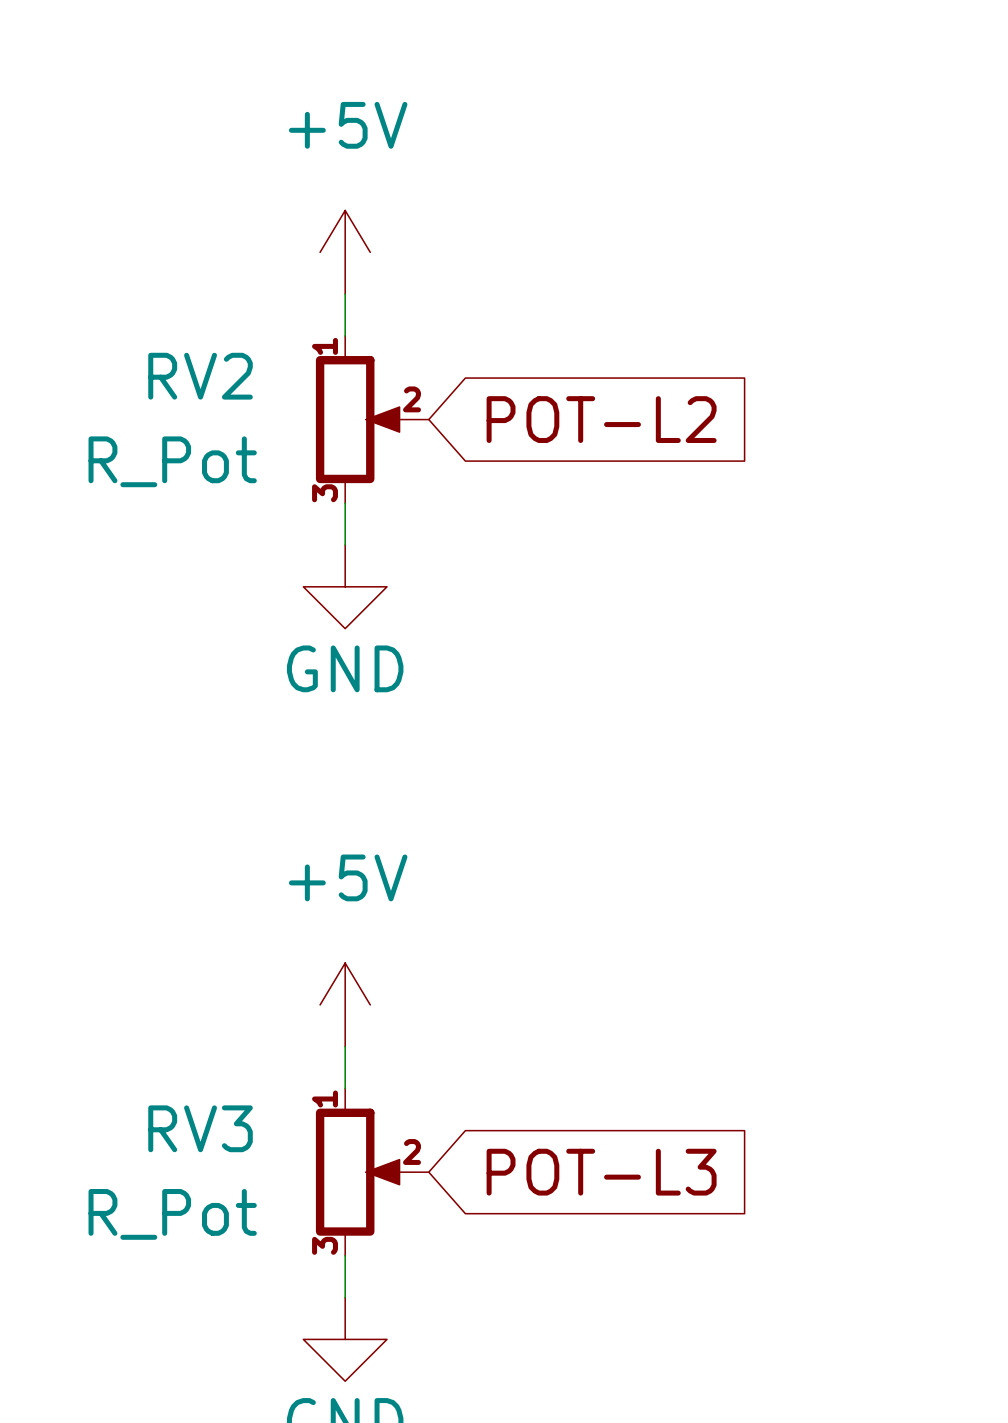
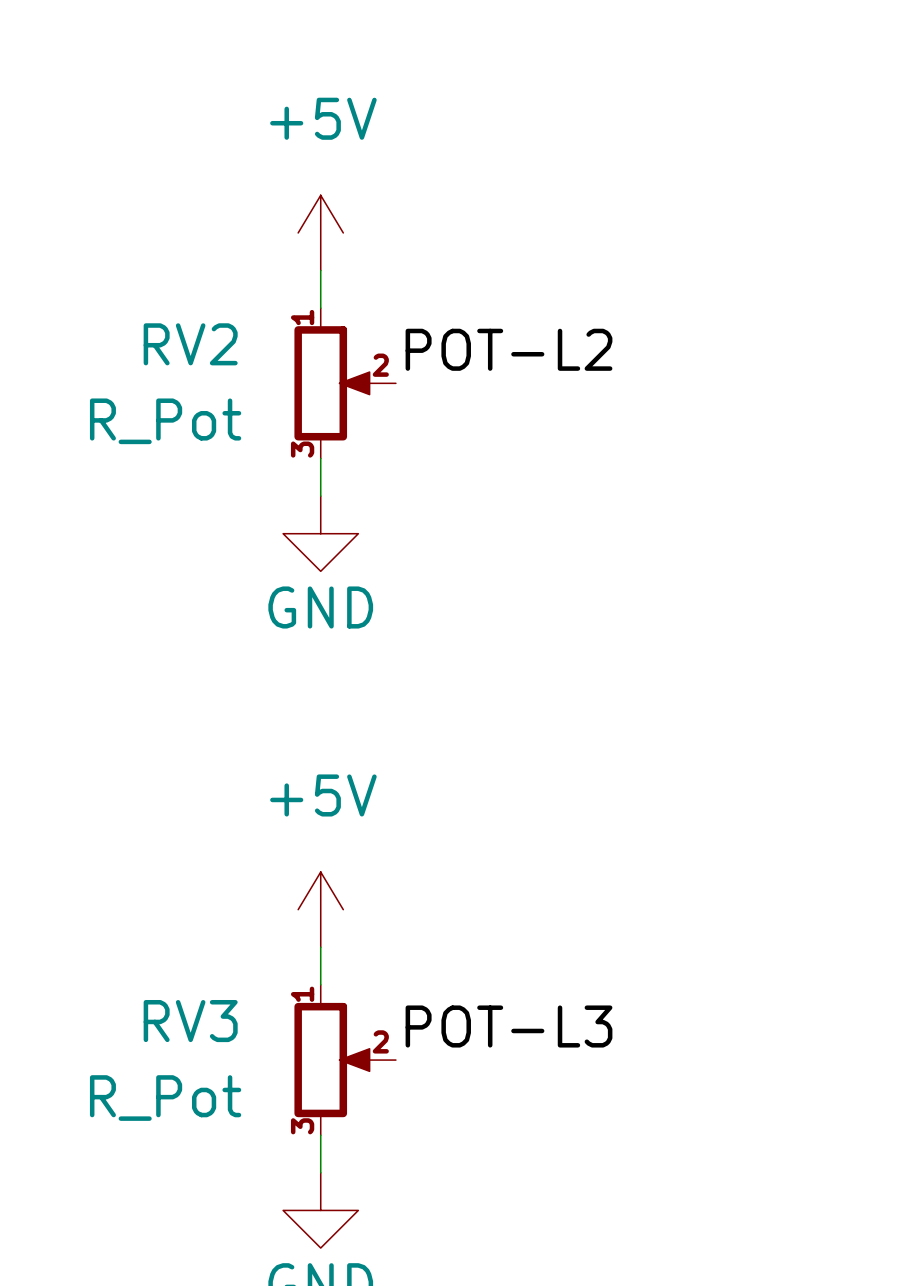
label: none -> POT-L2 (508, 349)
global label: POT-L2 (601, 419) -> none
label: none -> POT-L3 (508, 1026)
global label: POT-L3 (601, 1172) -> none

